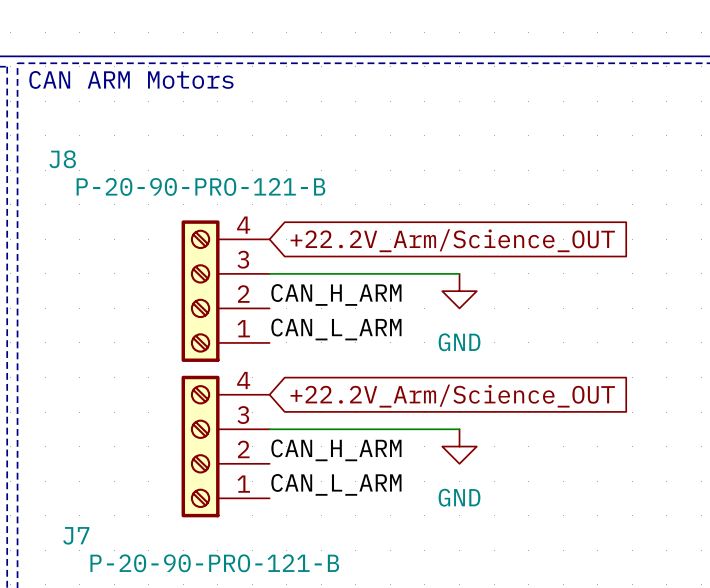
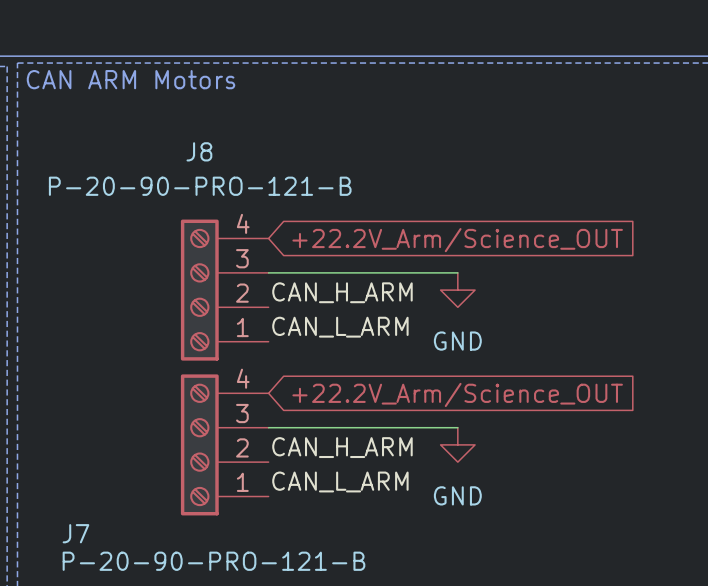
J8 name position: J8 (62, 159) -> J8 (199, 151)

